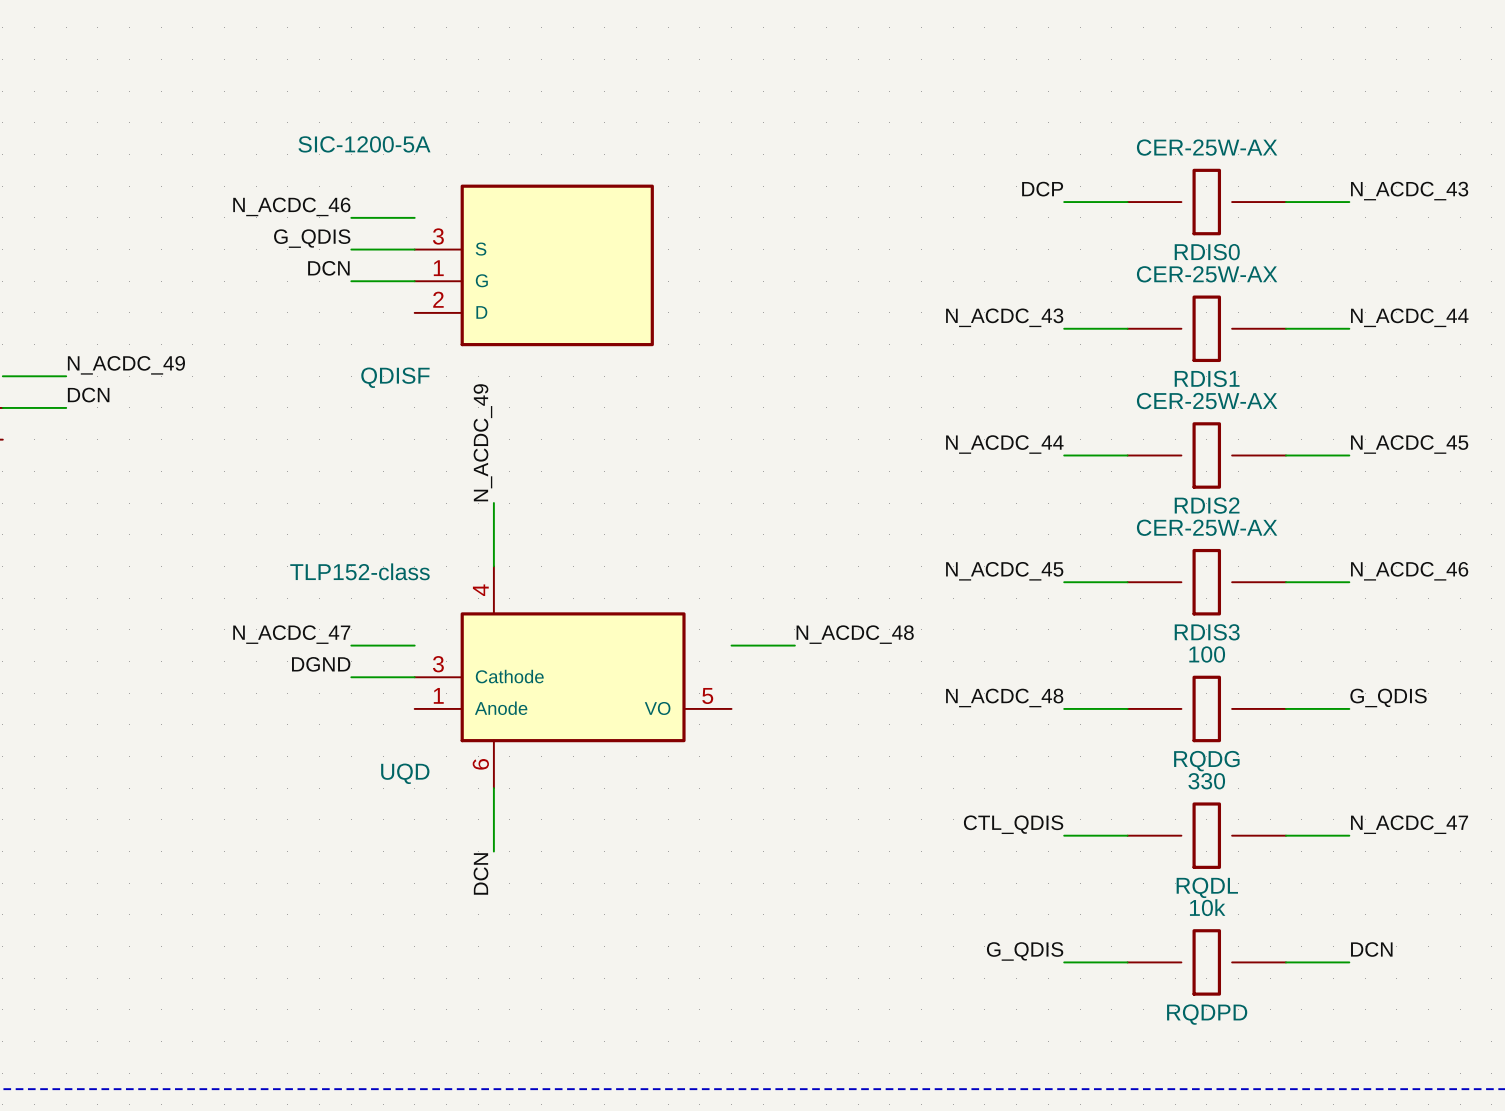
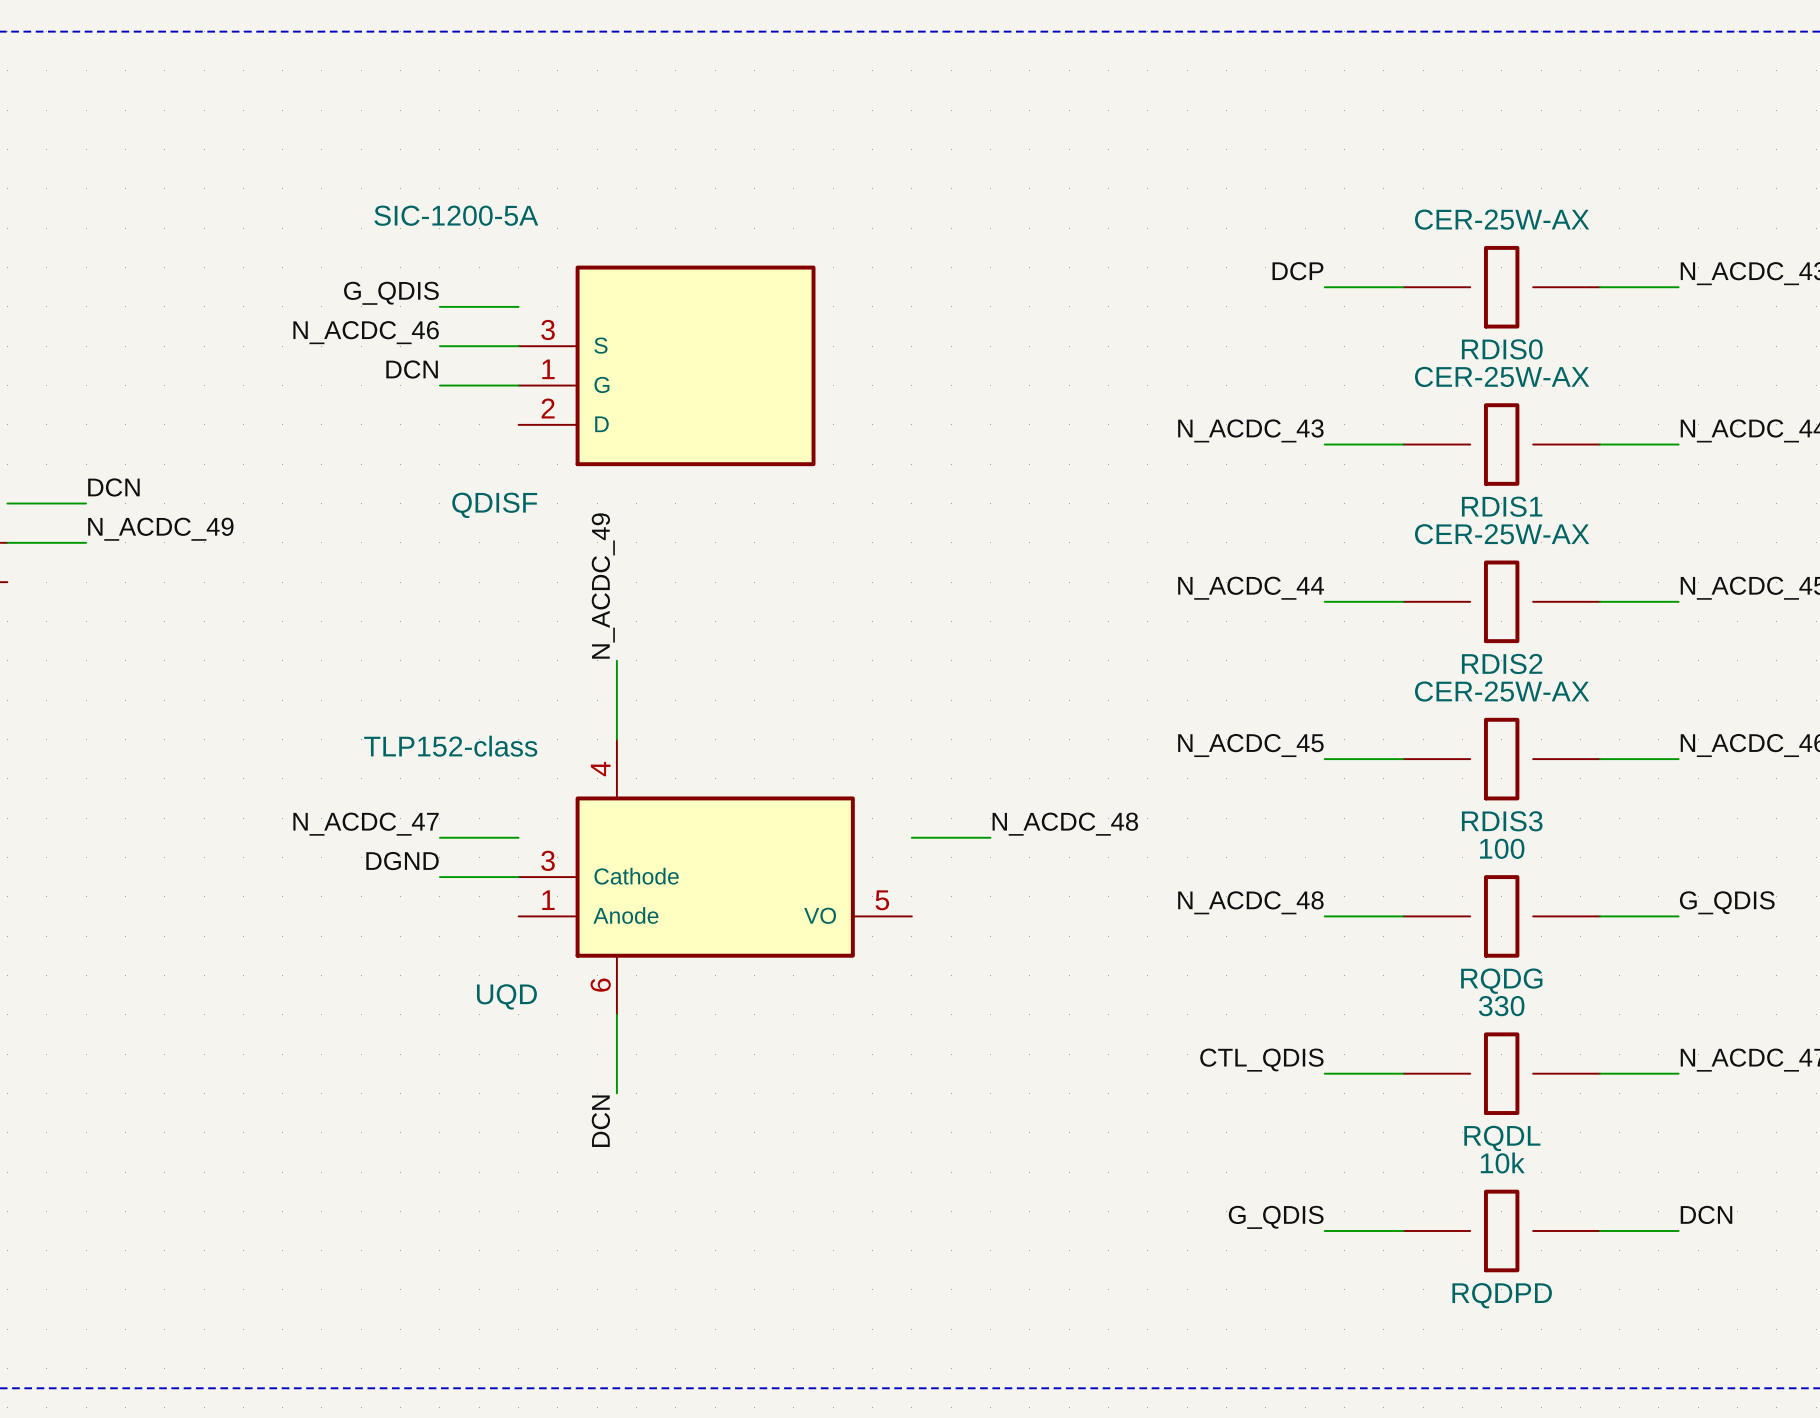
label: N_ACDC_46 (291, 206) -> G_QDIS (391, 293)
label: G_QDIS (312, 238) -> N_ACDC_46 (366, 332)
label: N_ACDC_49 (126, 365) -> DCN (113, 487)
label: DCN (88, 395) -> N_ACDC_49 (160, 529)

